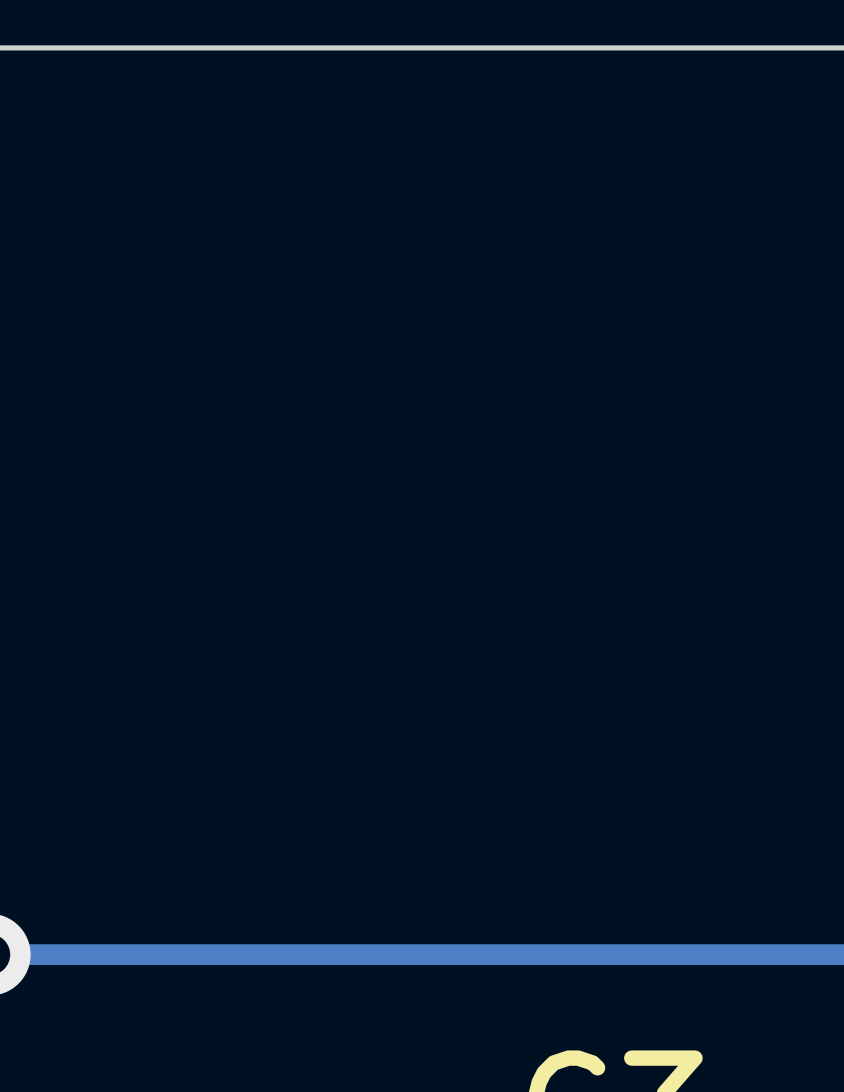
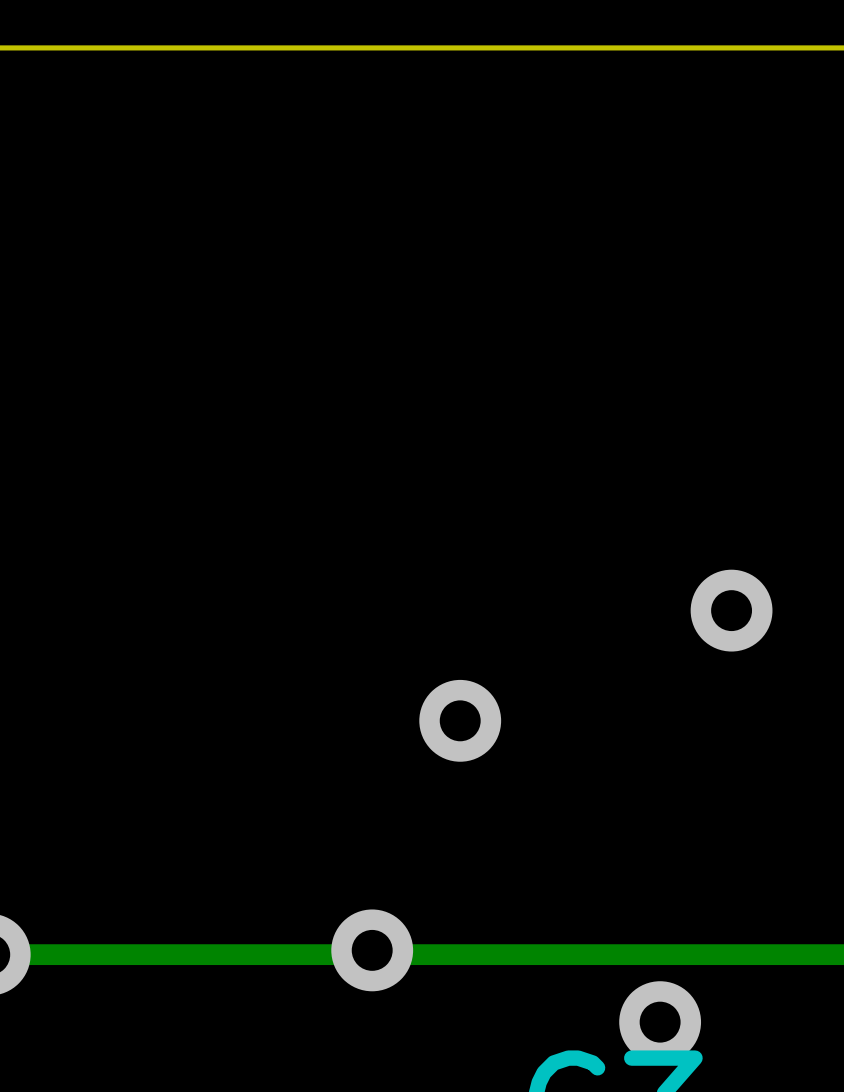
via: none -> (731, 610)
via: none -> (460, 720)
via: none -> (372, 950)
via: none -> (660, 1022)

